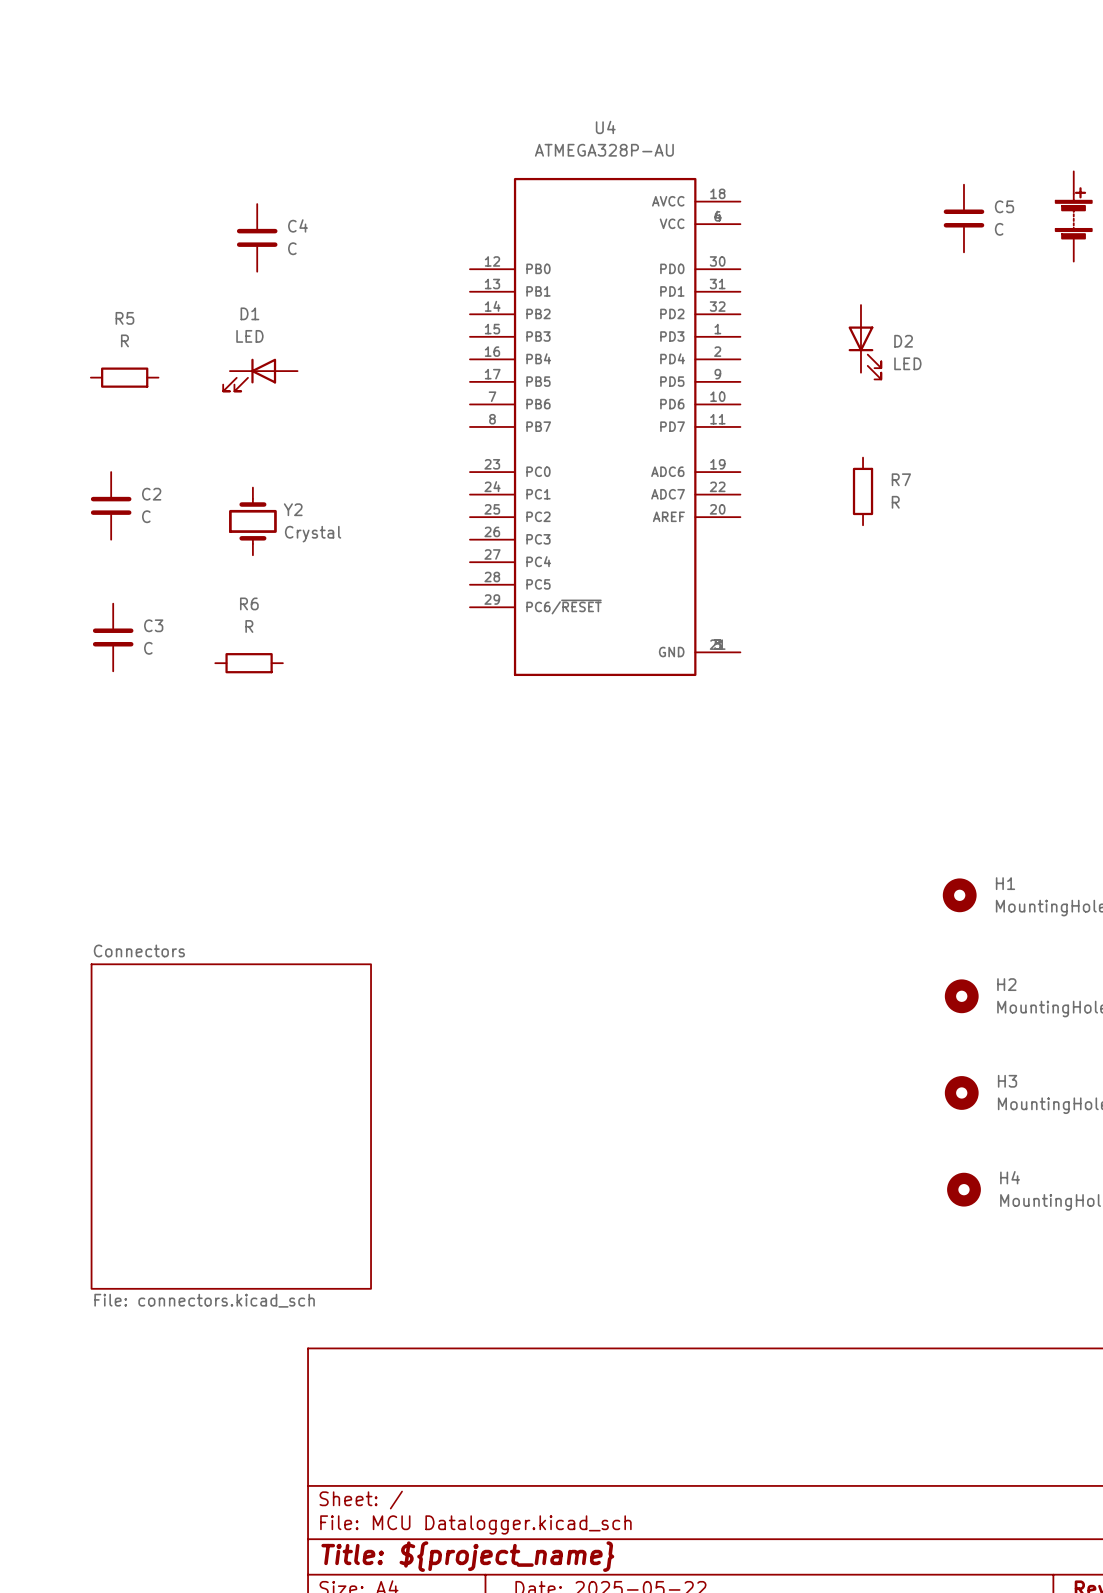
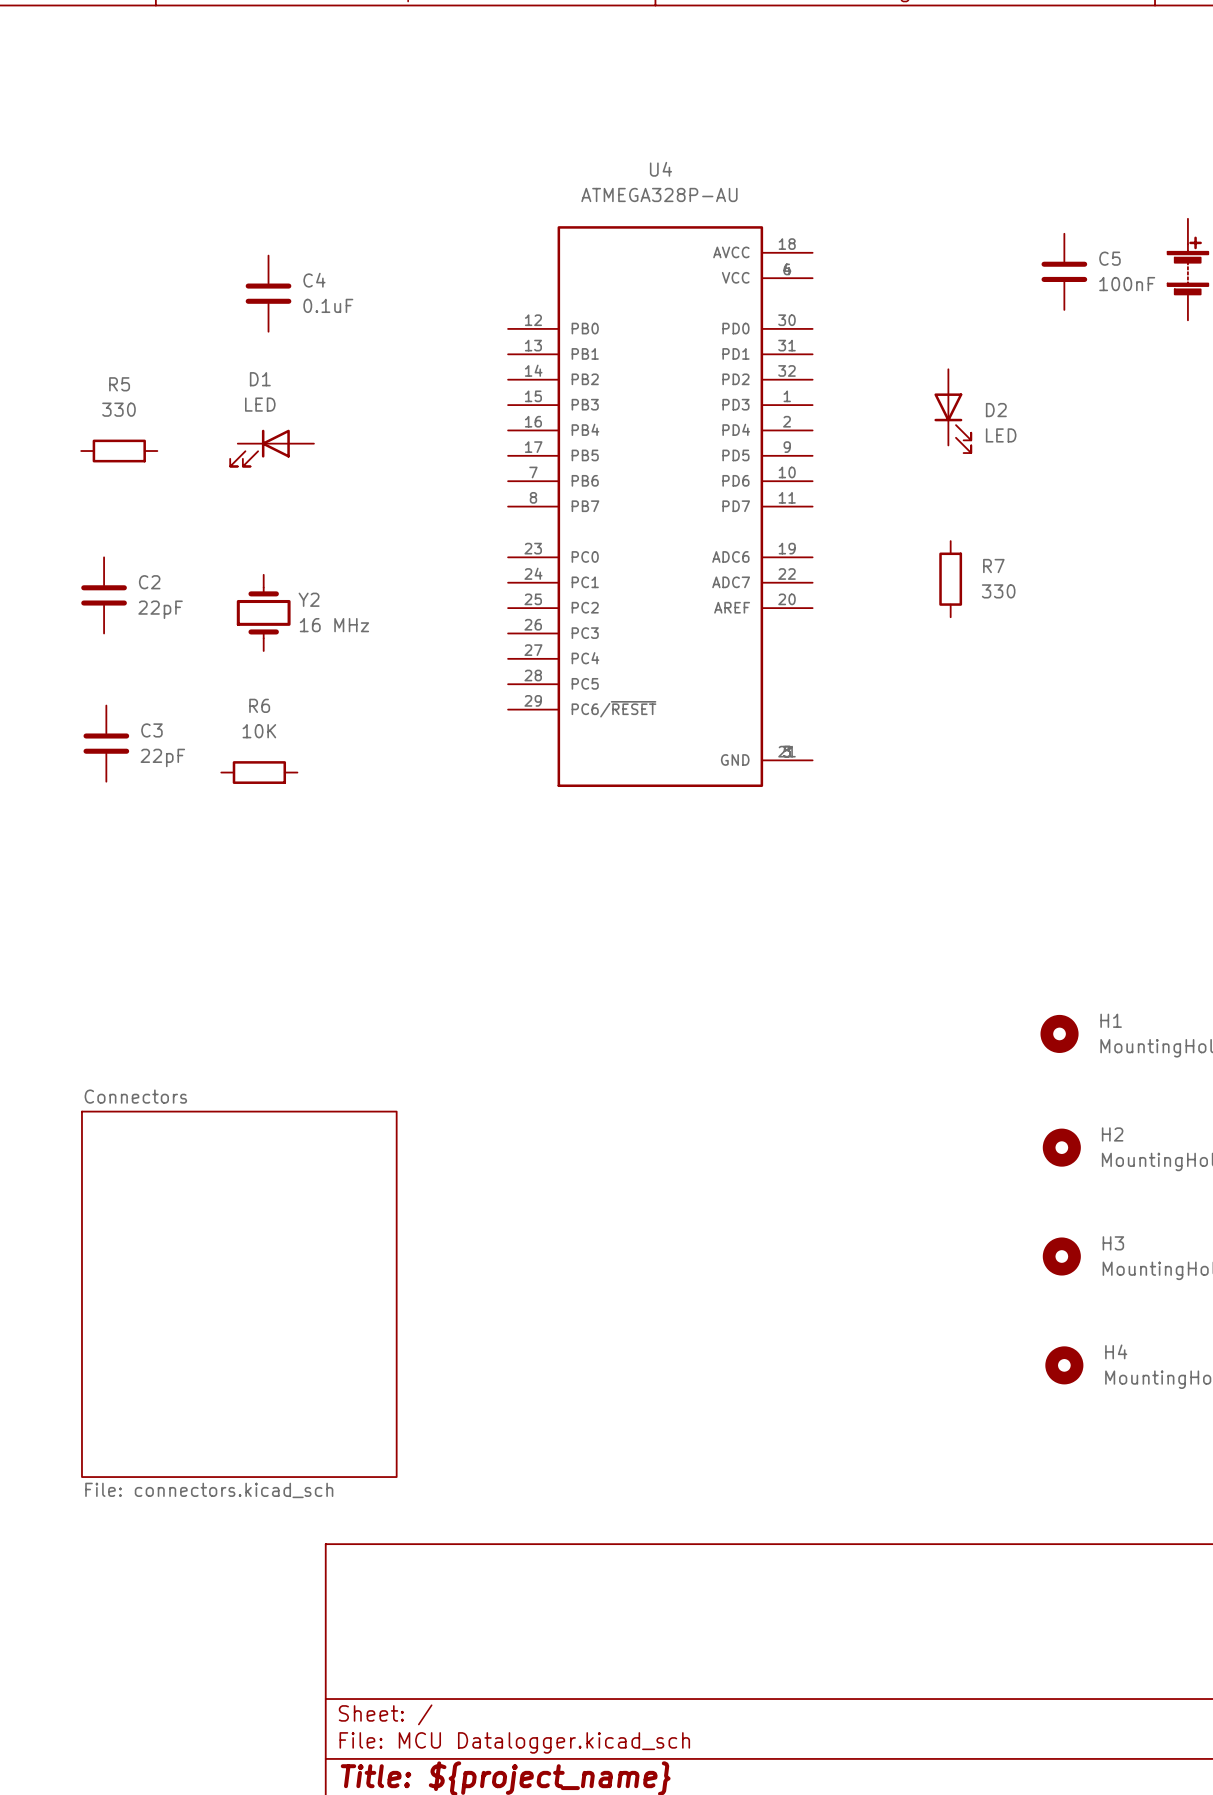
C5 value: C (999, 229) -> 100nF (1127, 284)
C4 value: C (292, 248) -> 0.1uF (328, 305)
R5 value: R (124, 340) -> 330 (118, 409)
R7 value: R (895, 502) -> 330 (998, 591)
C2 value: C (146, 516) -> 22pF (160, 609)
Y2 value: Crystal (313, 534) -> 16 MHz (334, 625)
R6 value: R (249, 626) -> 10K (259, 731)
C3 value: C (148, 648) -> 22pF (162, 757)

